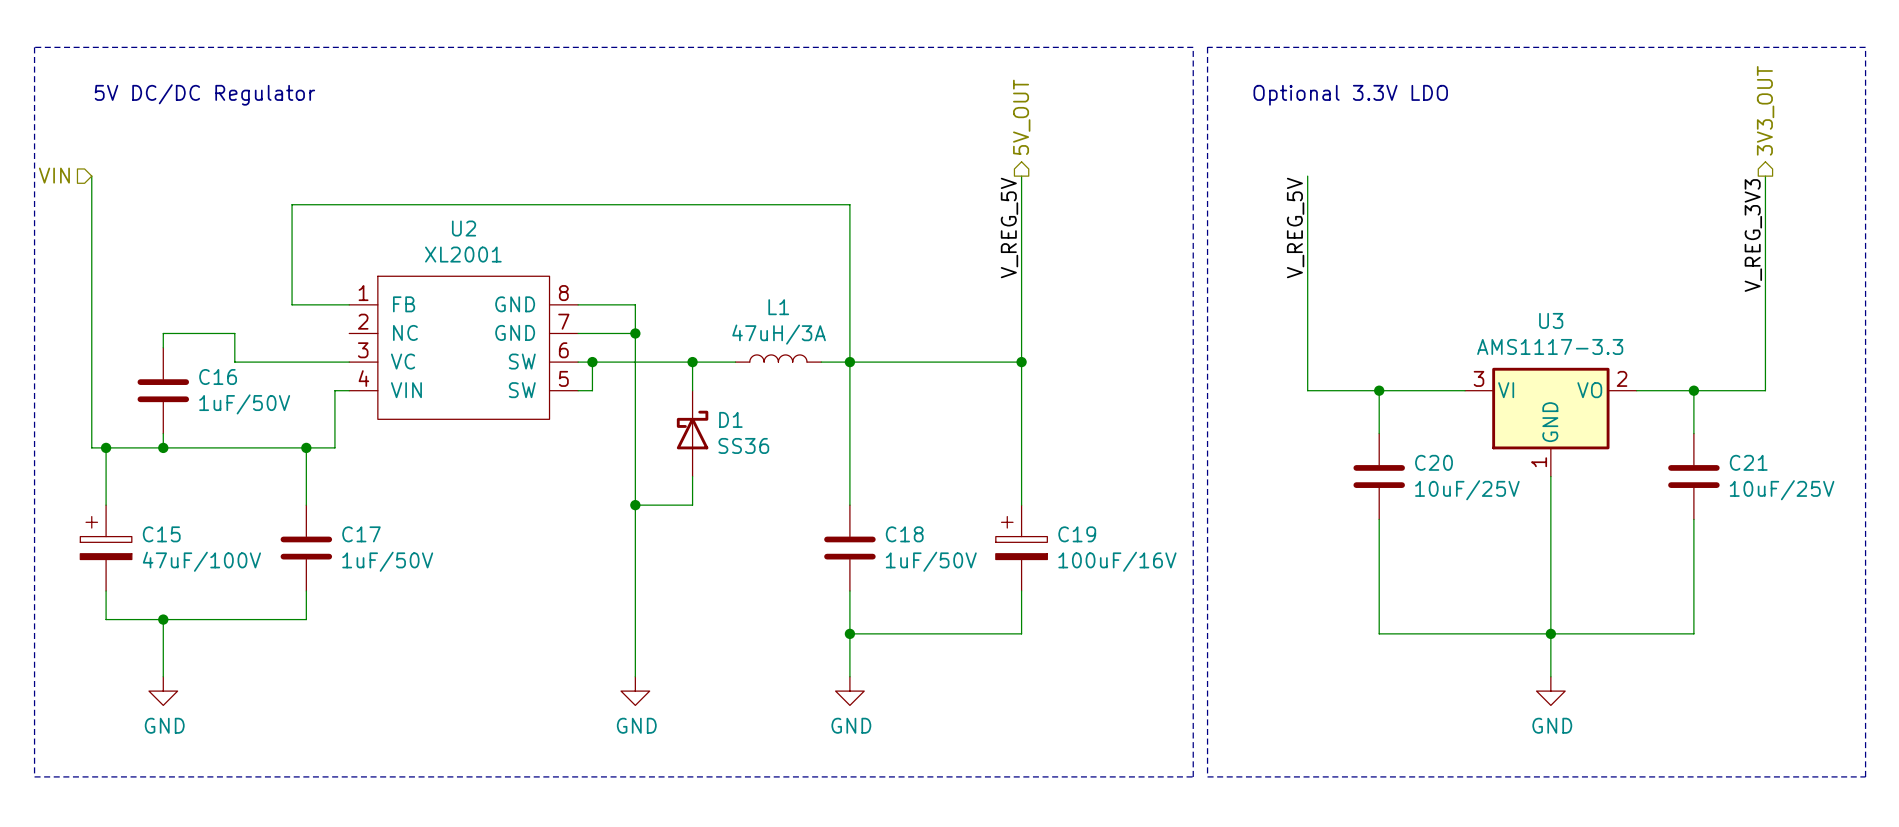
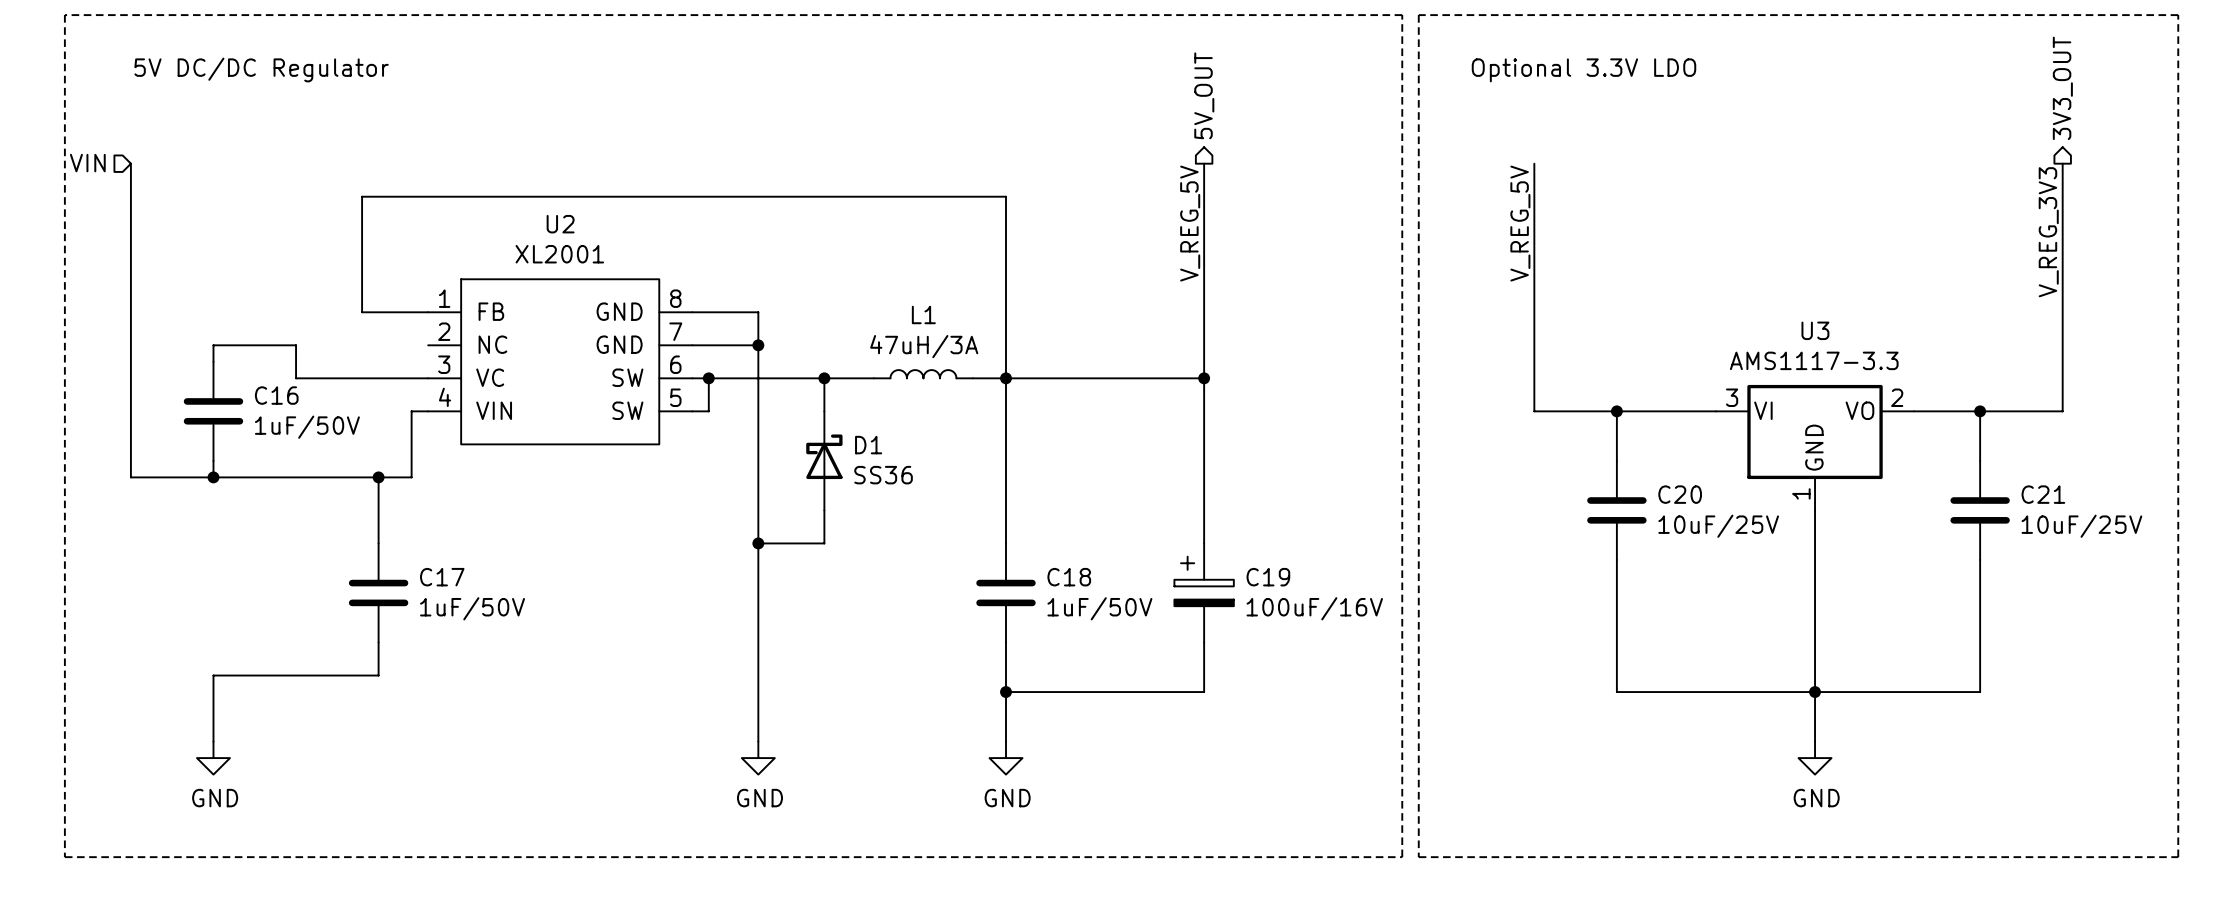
wire: (106, 447) (106, 505) -> none
junction: (106, 447) -> none
C15: 47uF/100V (106, 548) -> none
wire: (106, 590) (106, 619) (163, 619) -> none
junction: (163, 619) -> none

